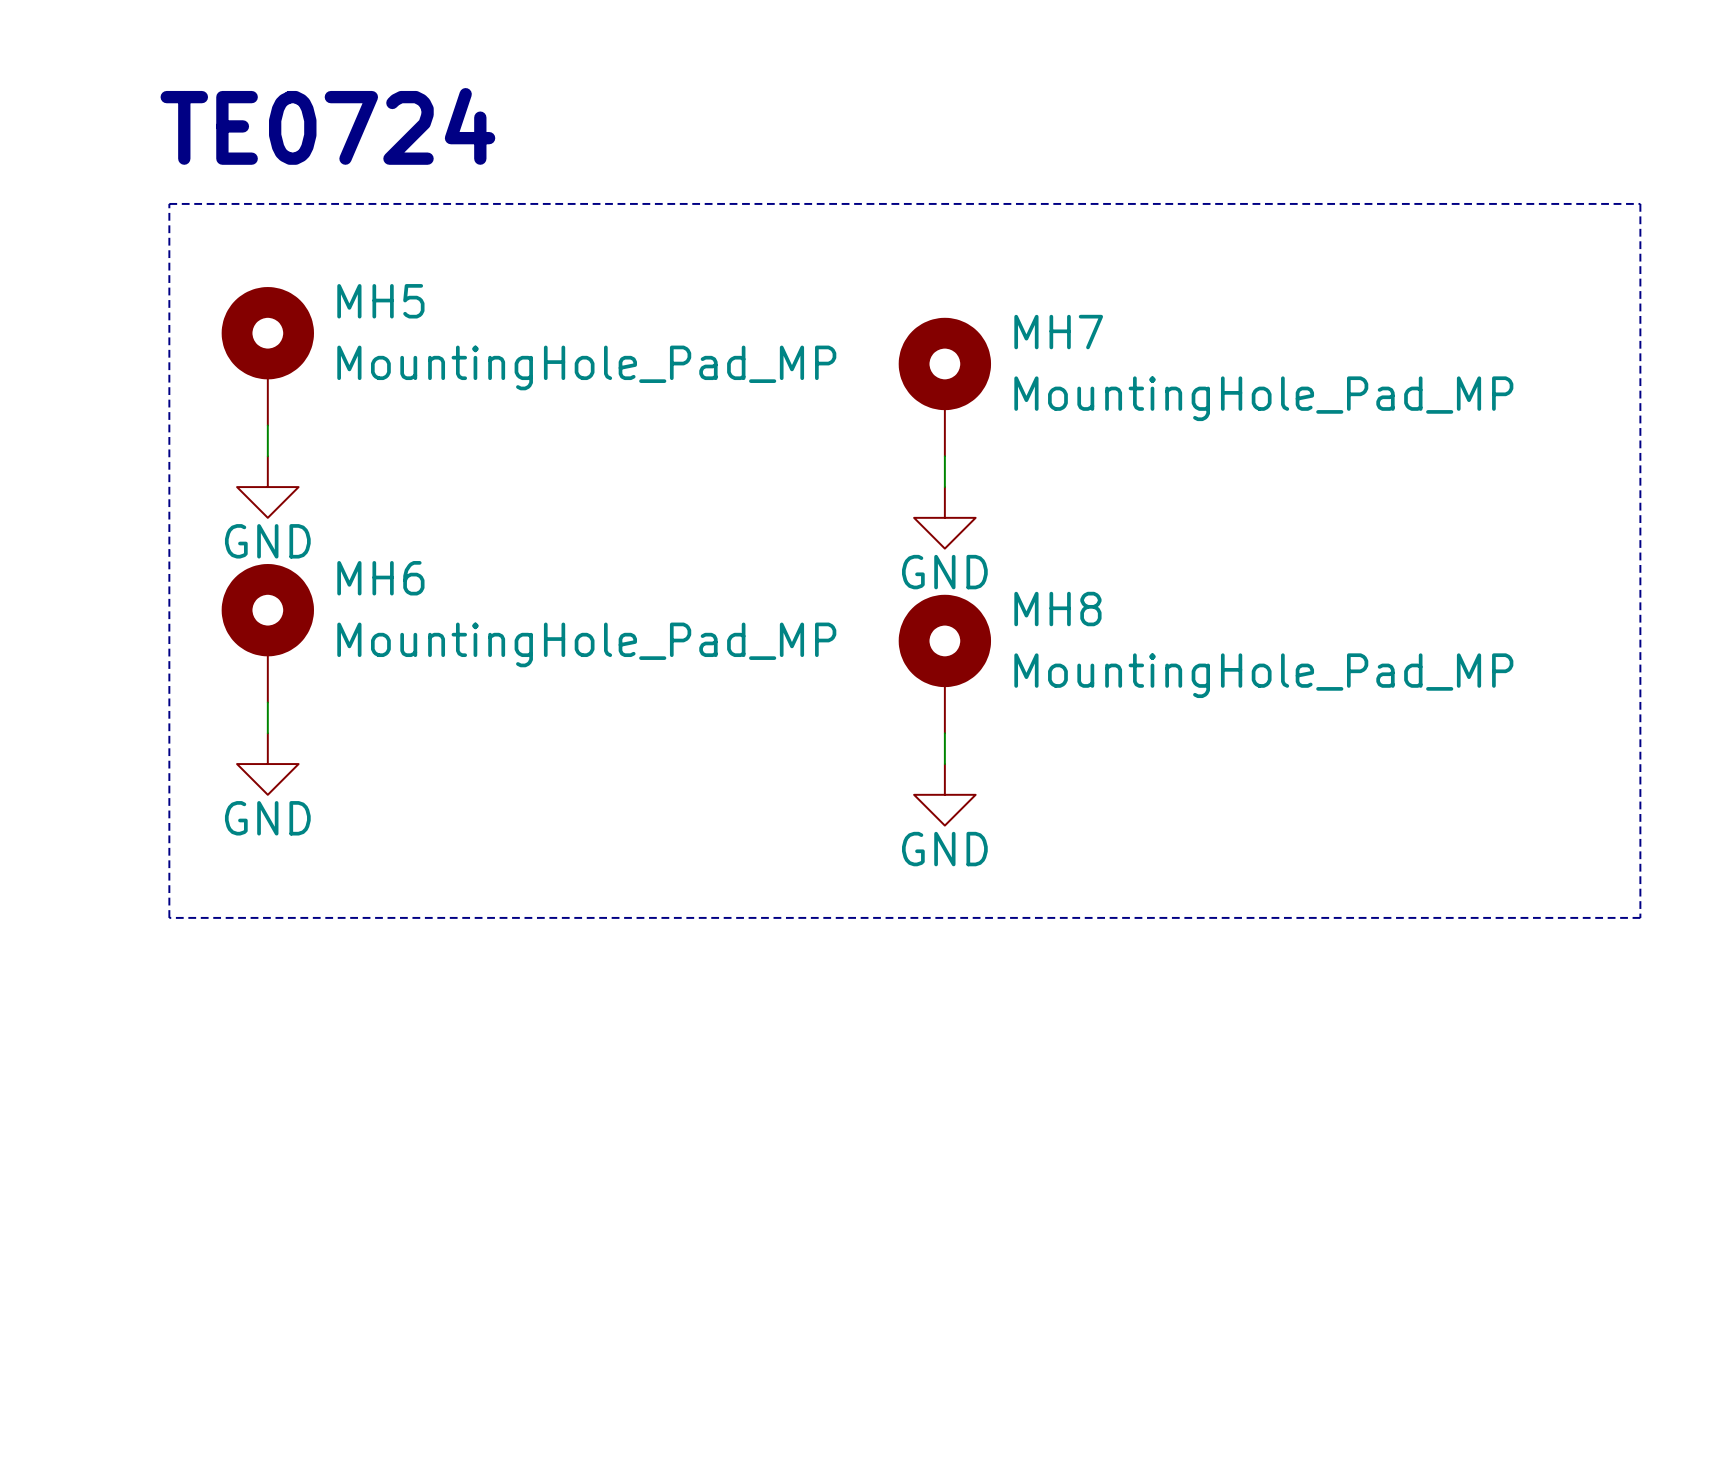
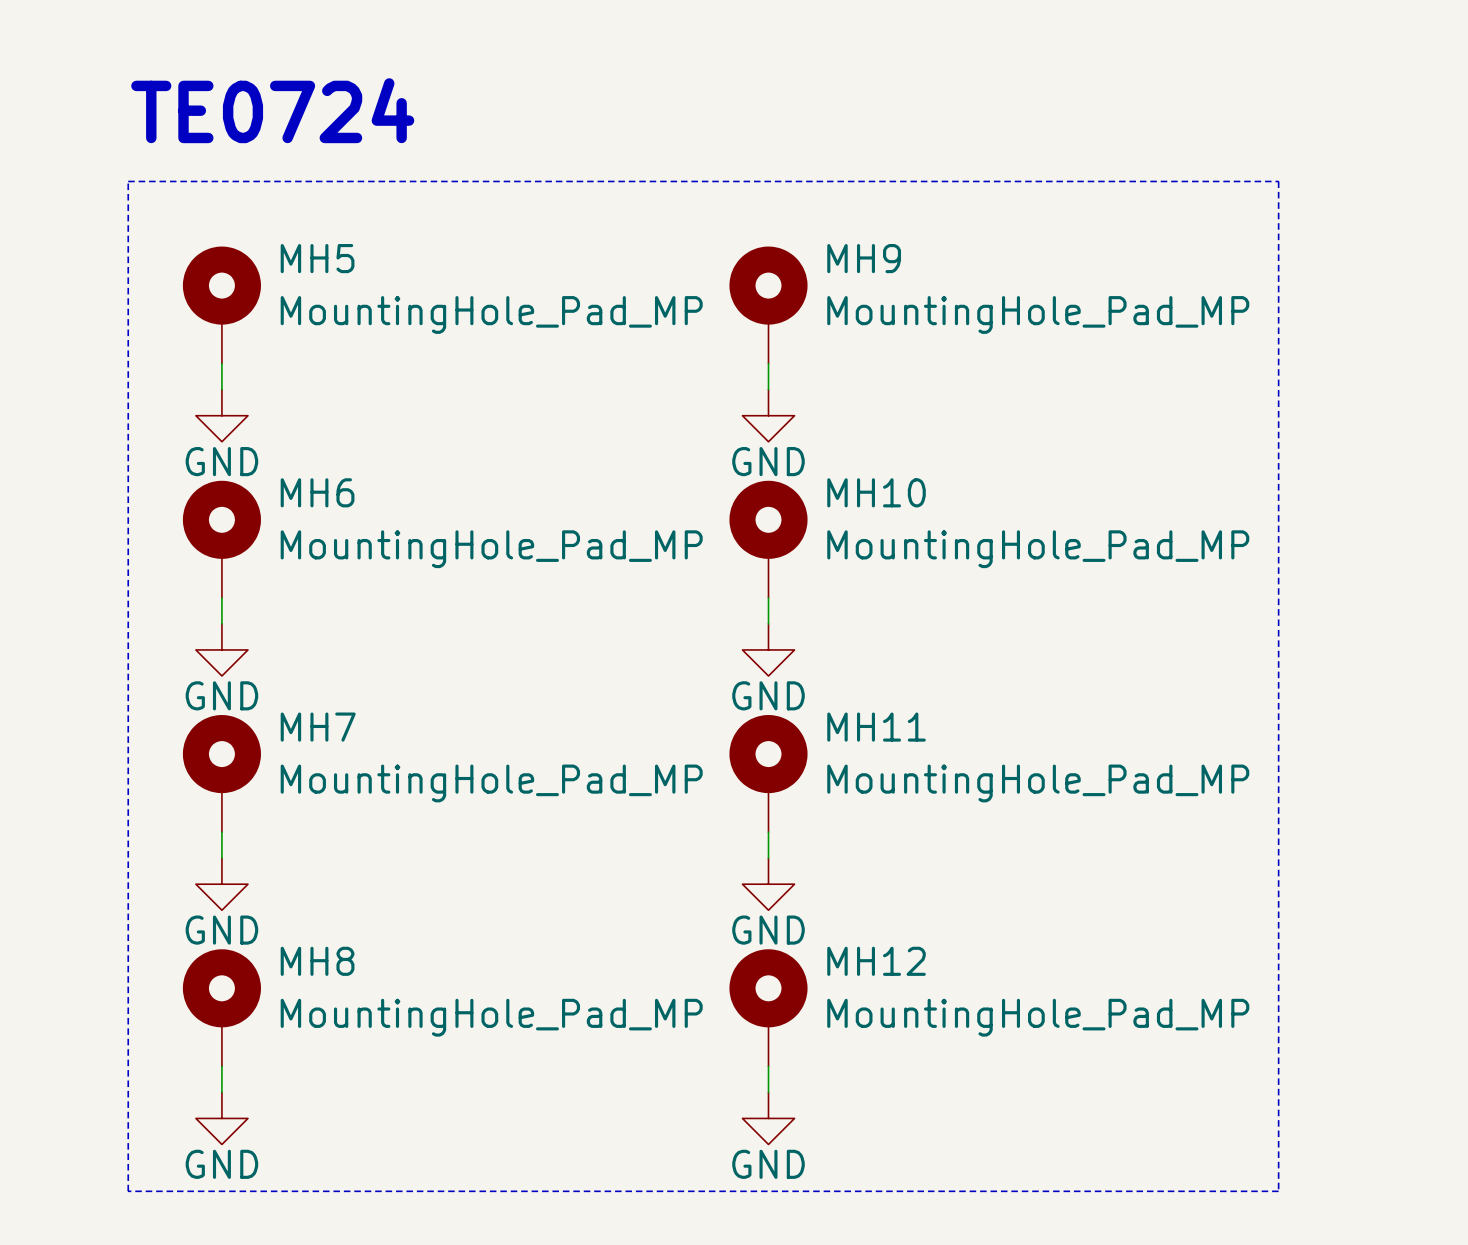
line: (169, 203) (1640, 203) (1640, 917) (169, 917) (169, 203) -> (128, 181) (128, 1191) (1278, 1191) (1278, 181) (128, 181)
MH9: none -> MountingHole_Pad_MP (768, 305)
MH7 position: (944, 387) -> (221, 773)
wire: (944, 456) (944, 487) -> (768, 363) (768, 389)
power symbol position: GND (944, 517) -> GND (768, 415)
MH10: none -> MountingHole_Pad_MP (768, 539)
MH8 position: (944, 664) -> (221, 1007)
wire: (944, 733) (944, 764) -> (768, 597) (768, 623)
power symbol position: GND (944, 794) -> GND (768, 649)
MH11: none -> MountingHole_Pad_MP (768, 773)
wire: none -> (221, 832) (221, 858)
wire: none -> (768, 832) (768, 858)
power symbol: none -> GND (221, 884)
power symbol: none -> GND (768, 884)
MH12: none -> MountingHole_Pad_MP (768, 1007)
wire: none -> (221, 1066) (221, 1092)
wire: none -> (768, 1066) (768, 1092)
power symbol: none -> GND (221, 1118)
power symbol: none -> GND (768, 1118)

